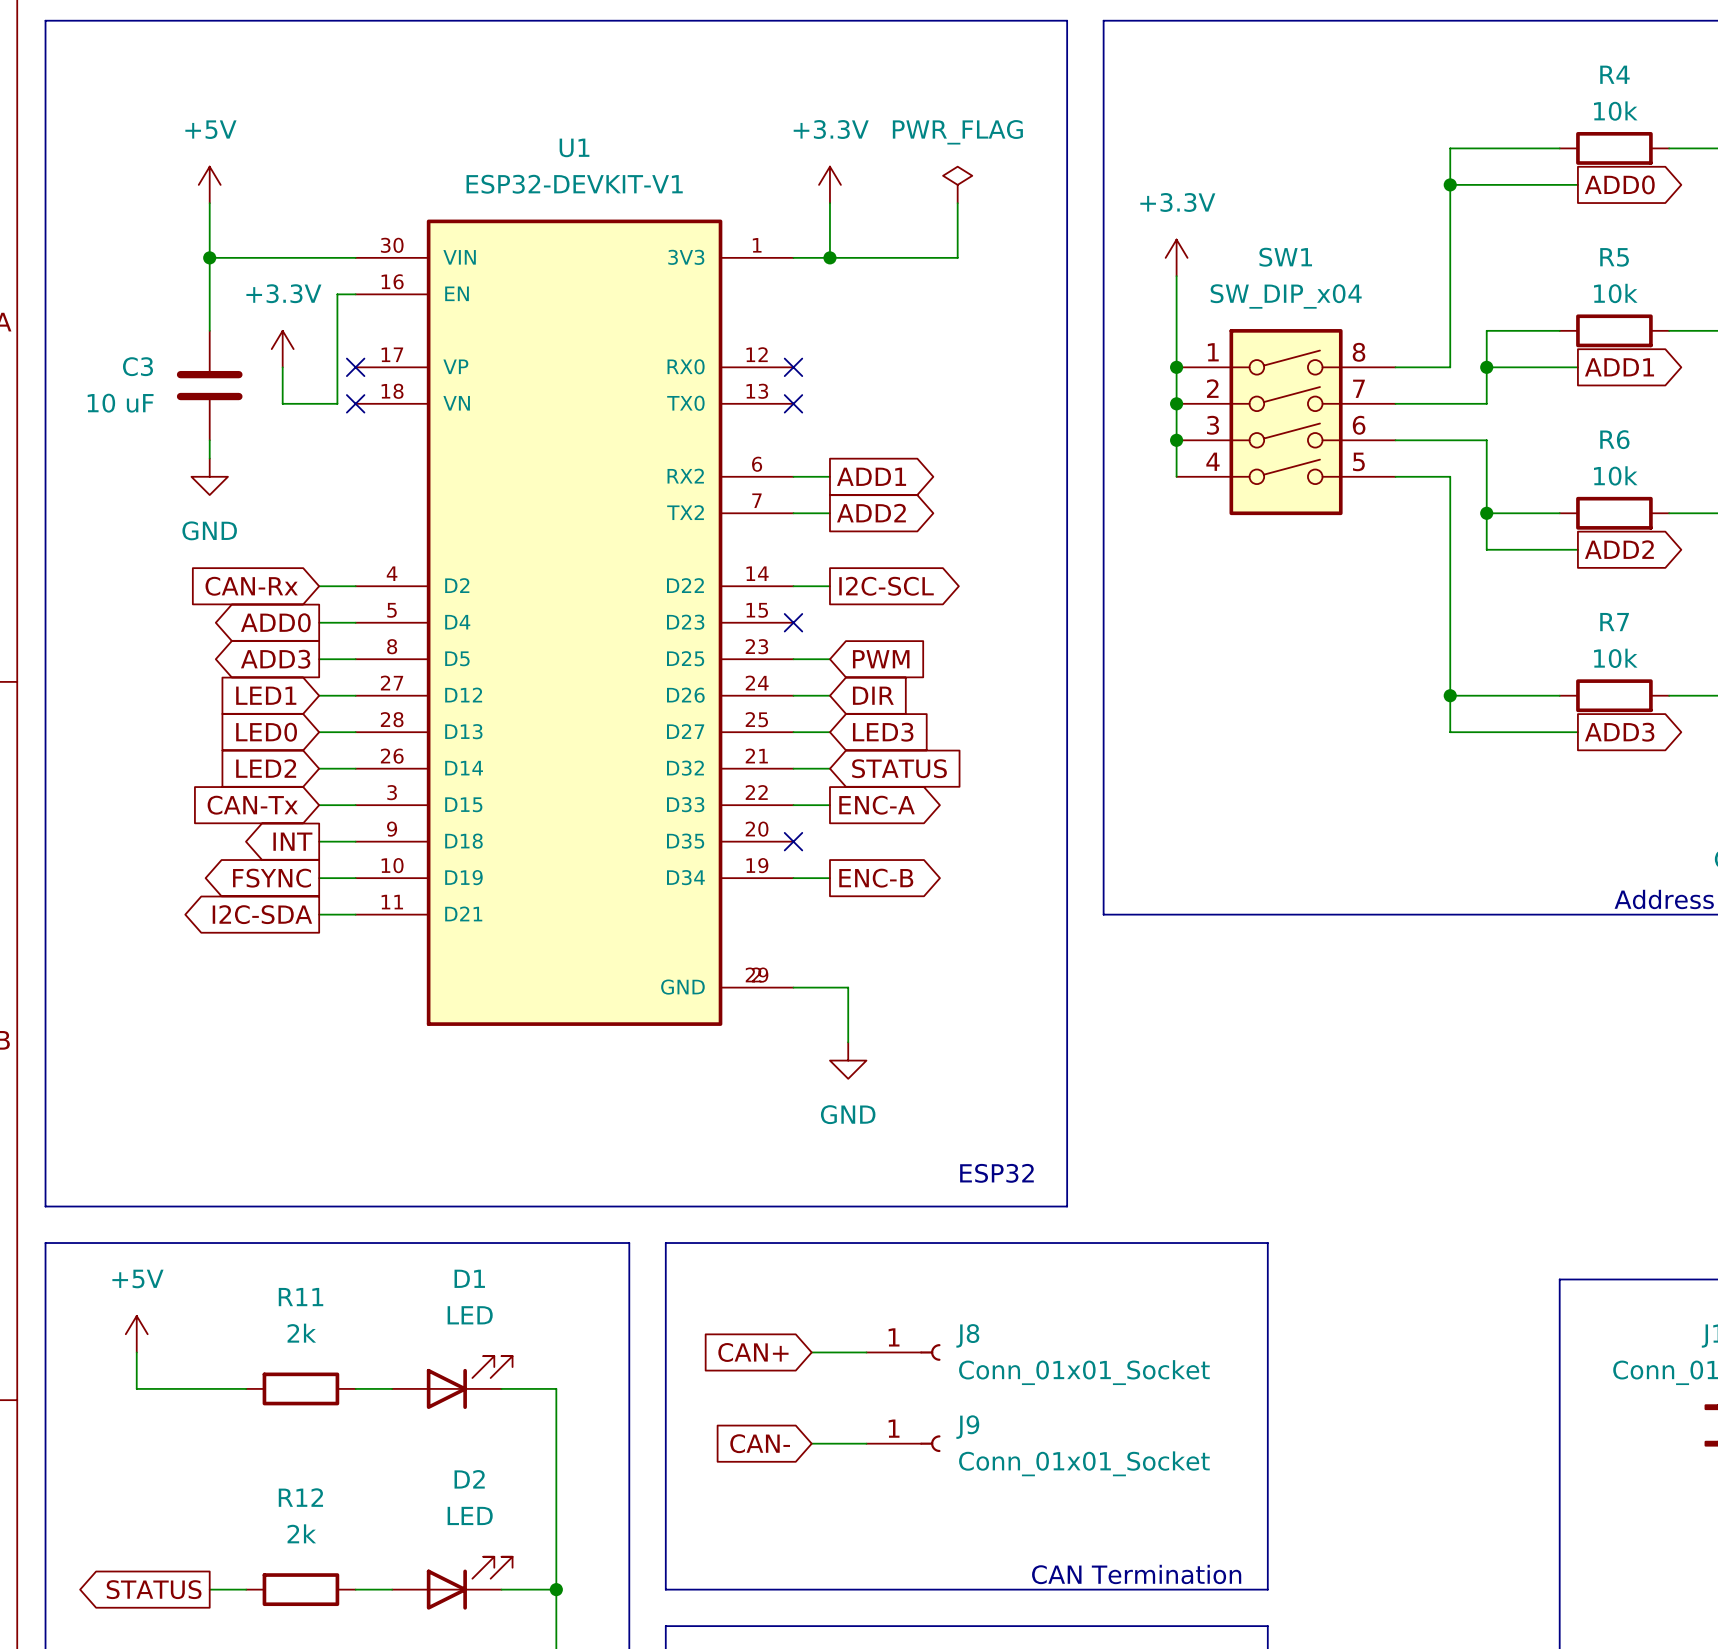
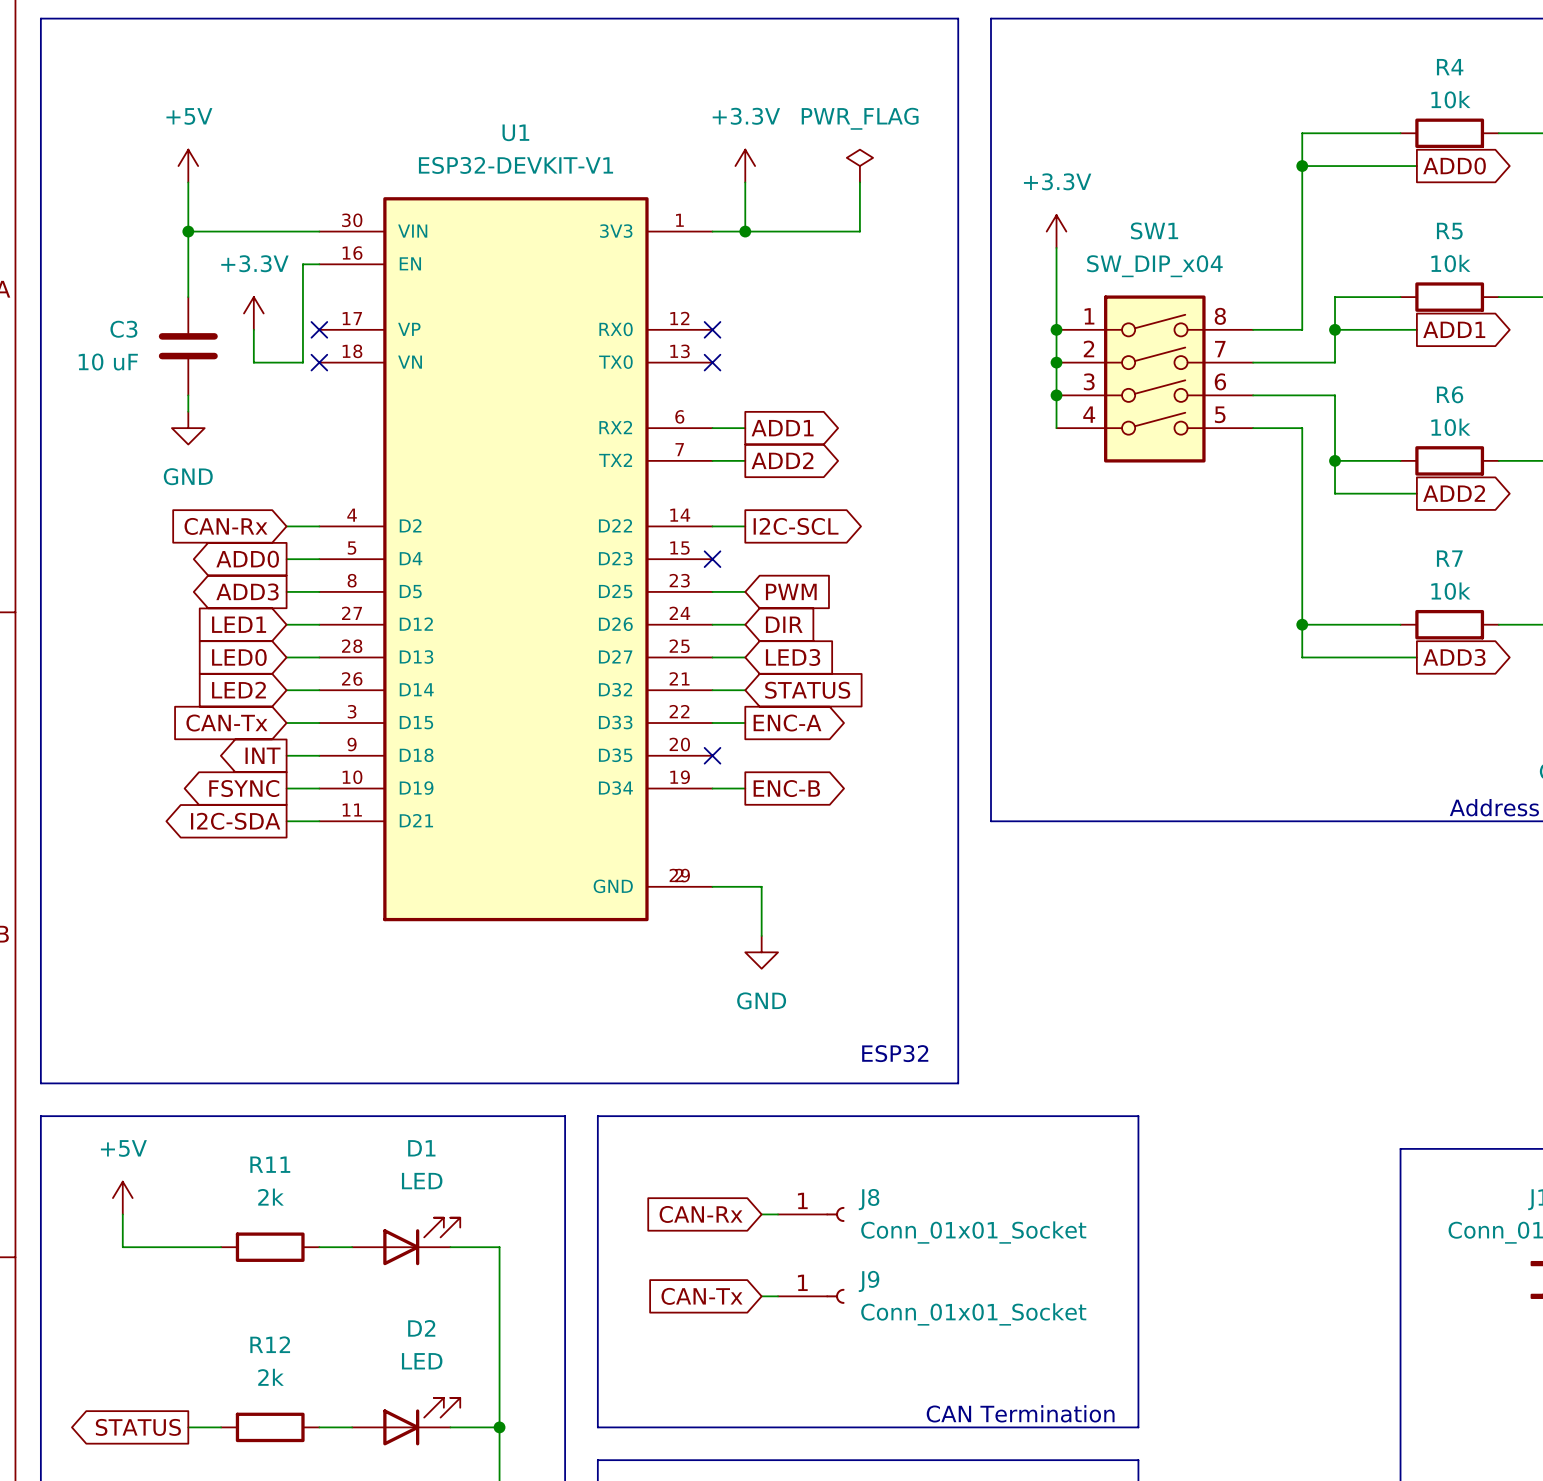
global label: CAN+ (753, 1352) -> none
global label: none -> CAN-Rx (701, 1214)
wire: (811, 1352) (848, 1352) -> none
global label: CAN- (760, 1443) -> CAN-Tx (701, 1296)
wire: (811, 1443) (848, 1443) -> none

